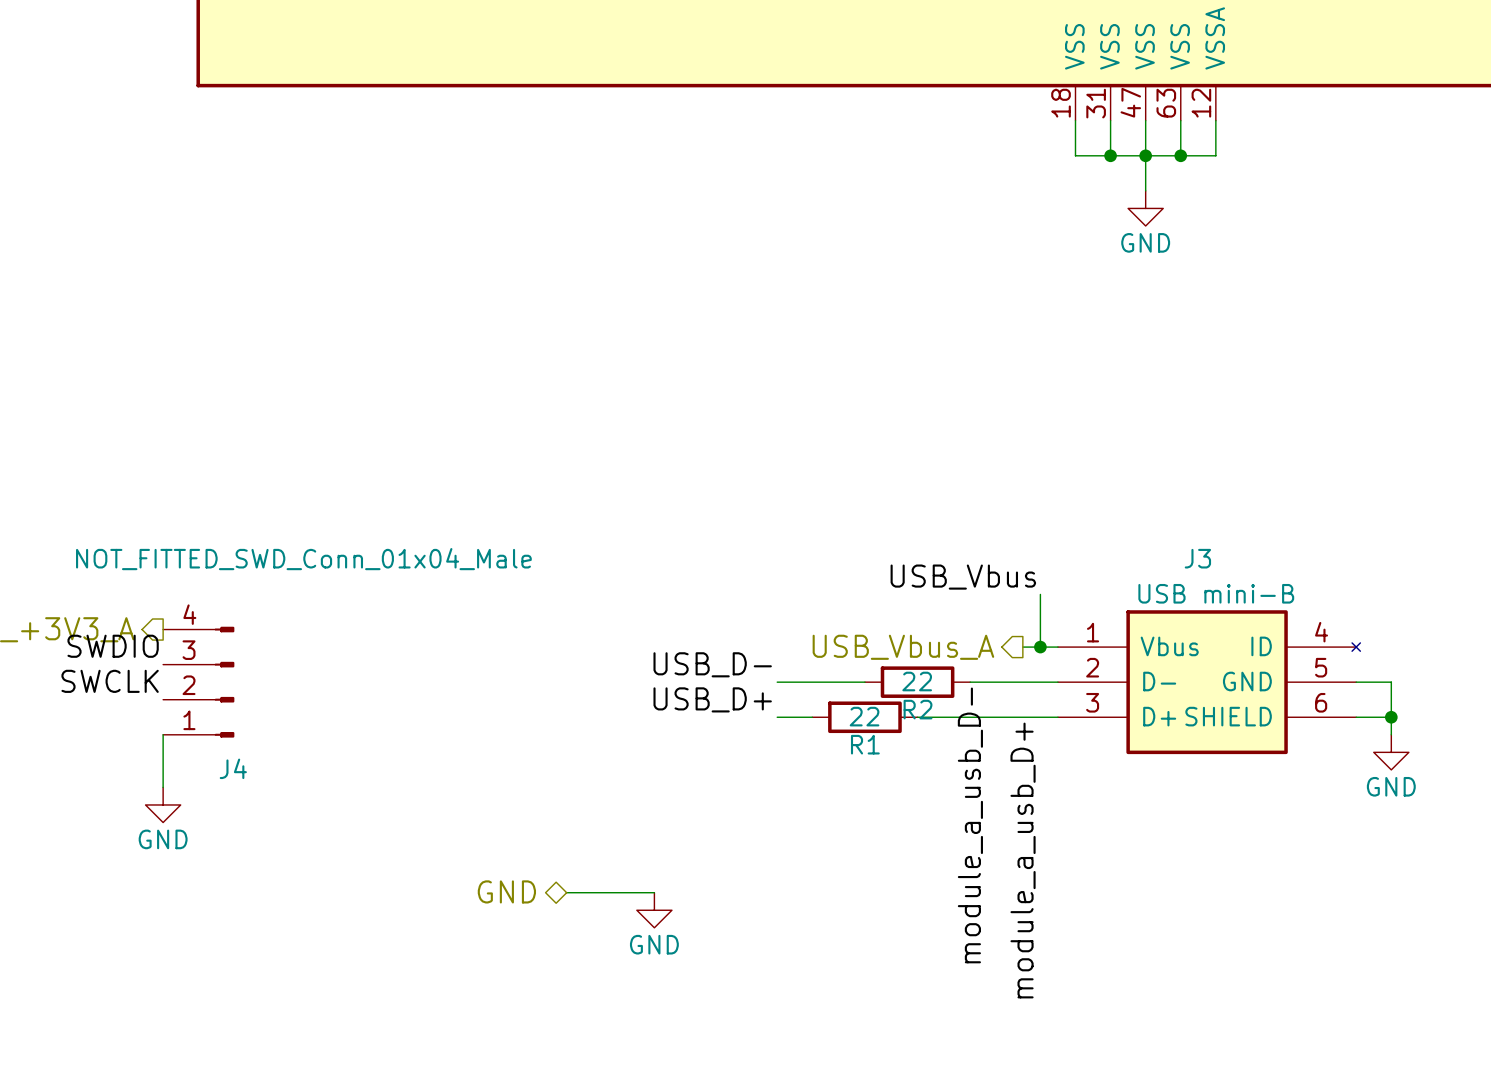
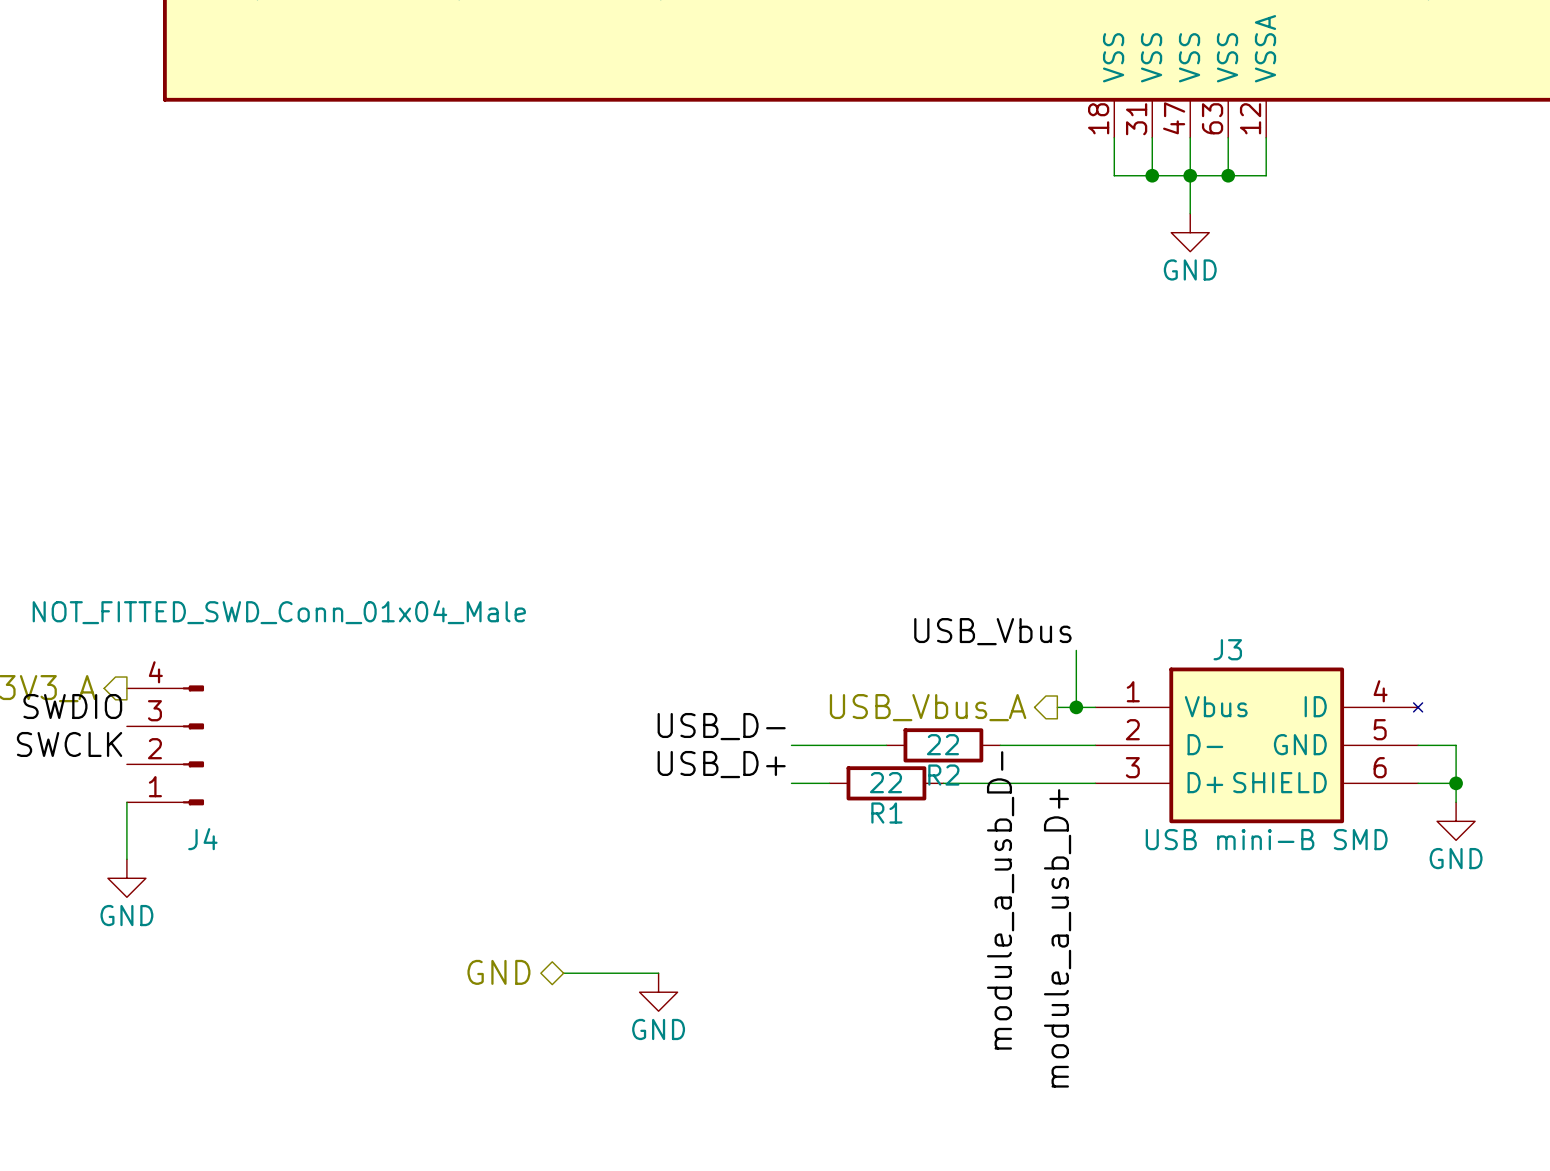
J3 name position: J3 (1197, 558) -> J3 (1227, 649)
J3 value: USB mini-B (1216, 593) -> USB mini-B SMD (1266, 839)

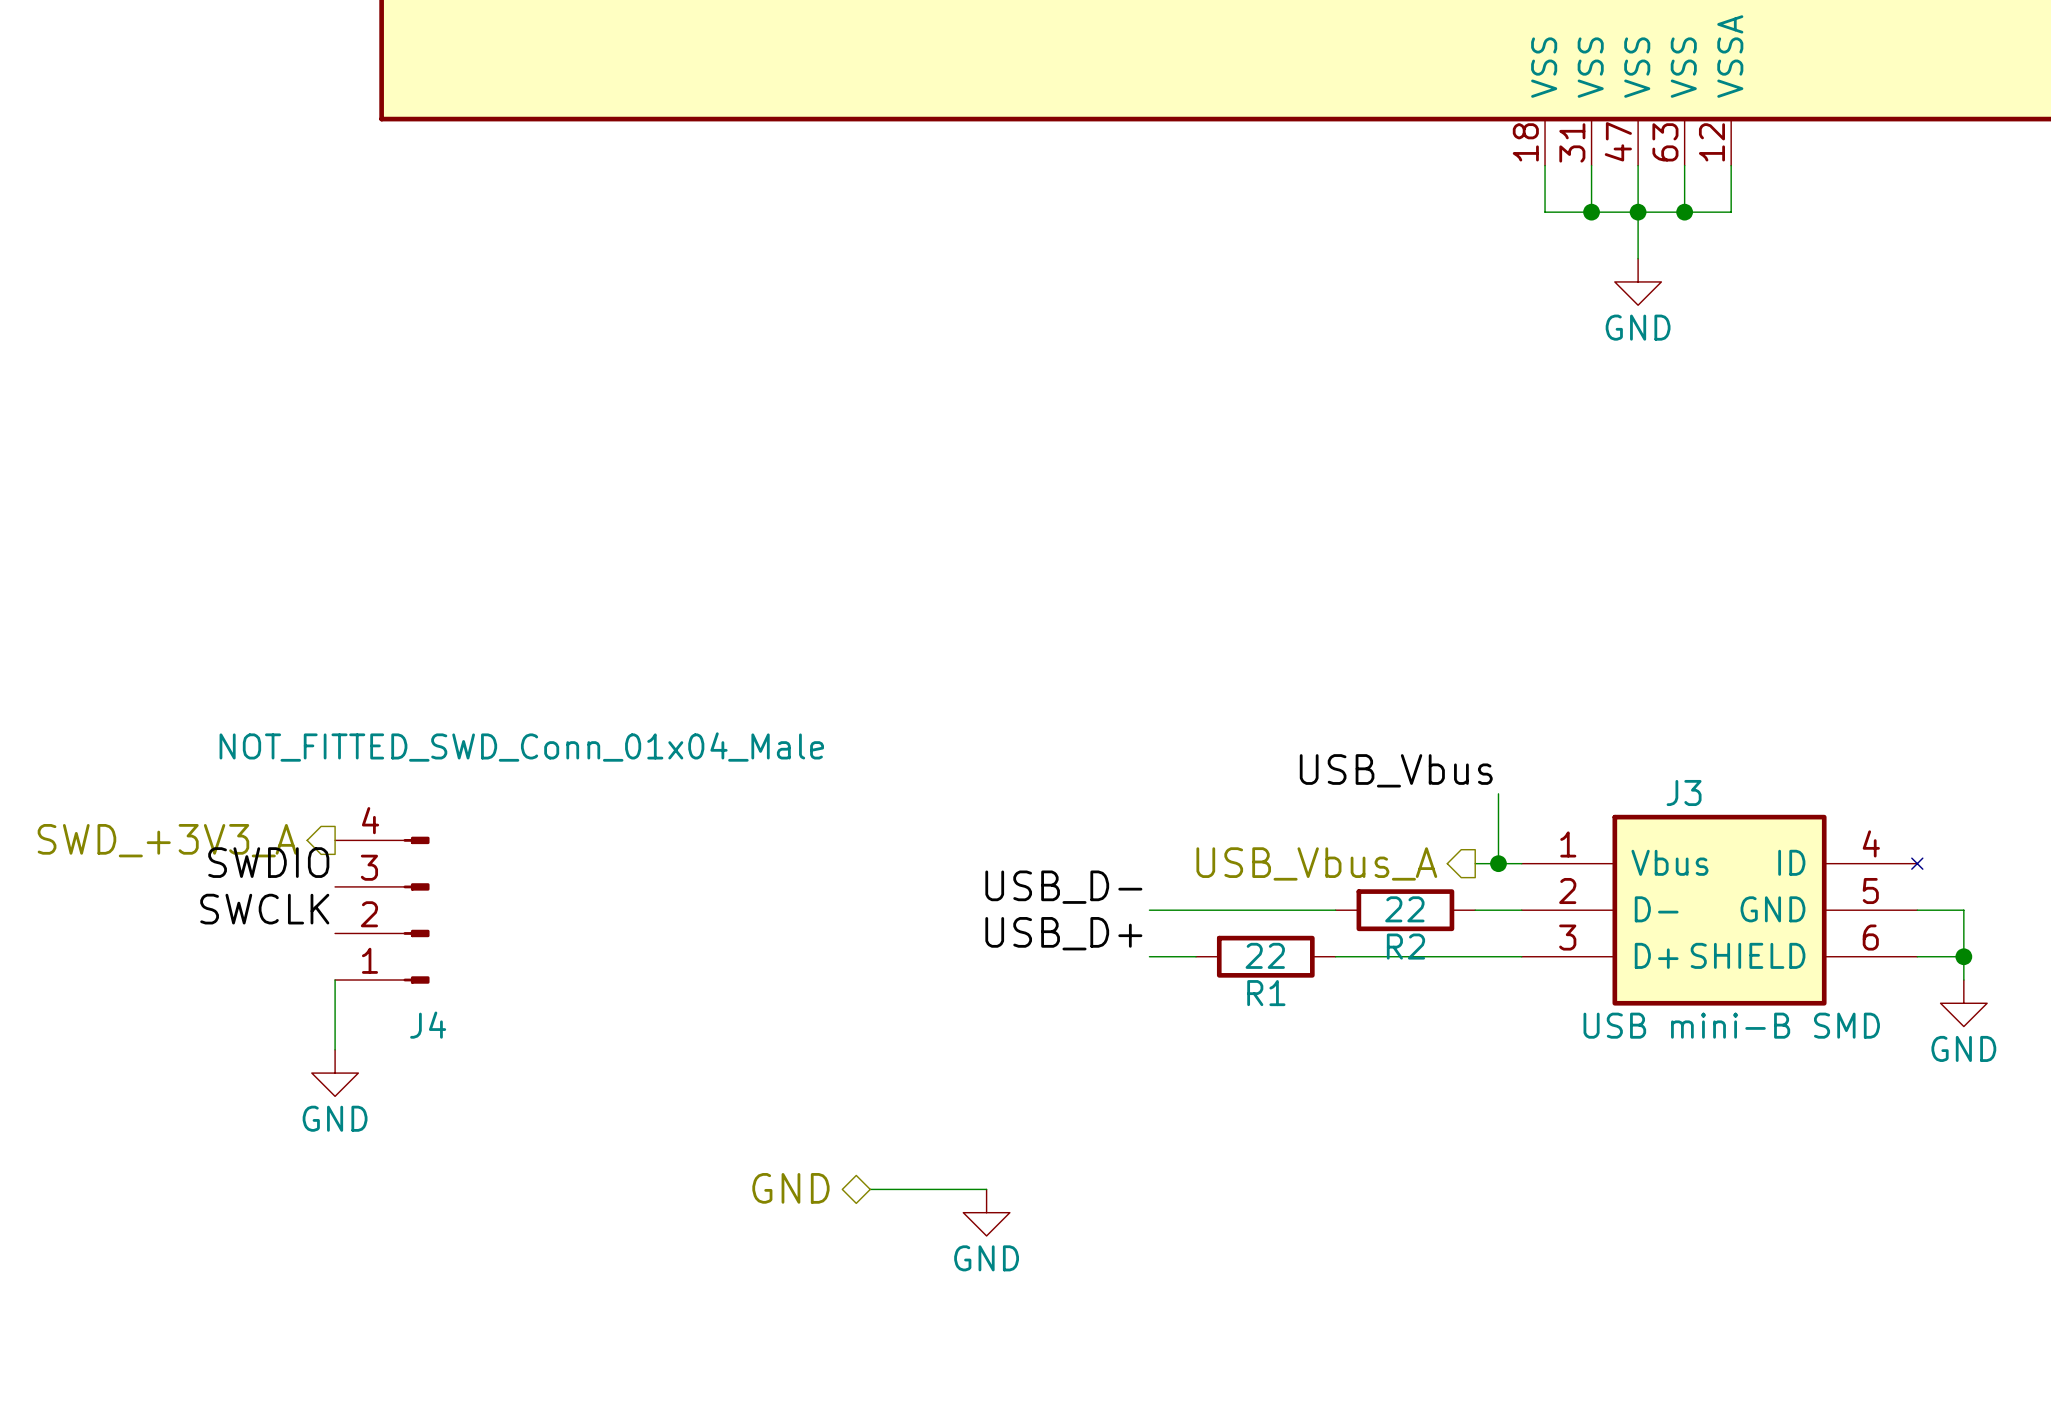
R2 position: (943, 745) -> (1405, 910)
wire: (1000, 745) (1057, 745) -> (1265, 910) (1335, 910)
label: module_a_usb_D- (1000, 900) -> none
label: module_a_usb_D+ (1057, 938) -> none

